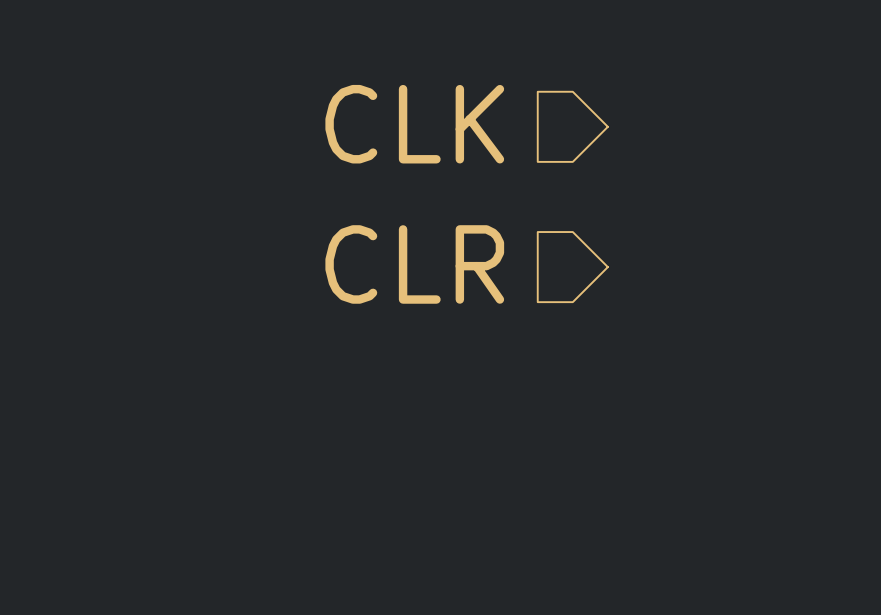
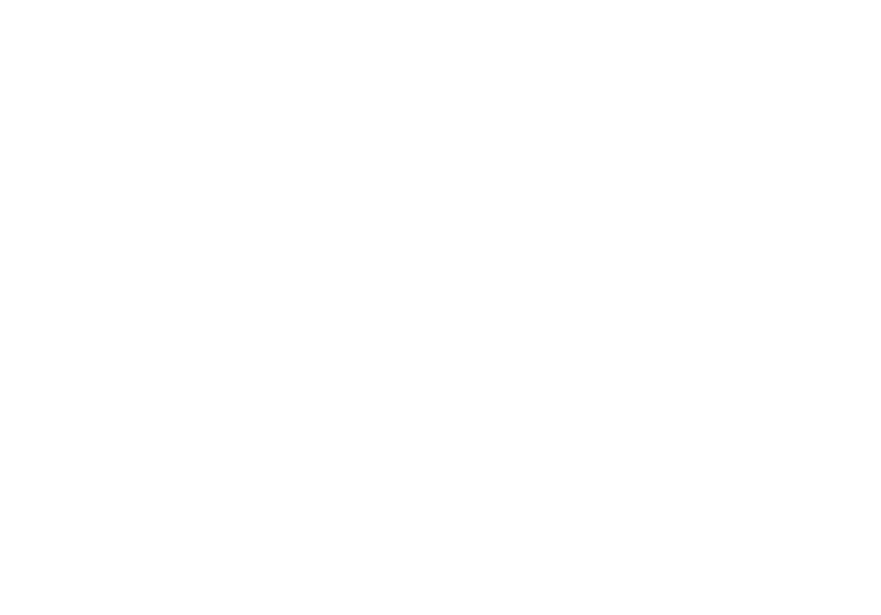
hierarchical label: CLK (414, 124) -> none
hierarchical label: CLR (414, 264) -> none

